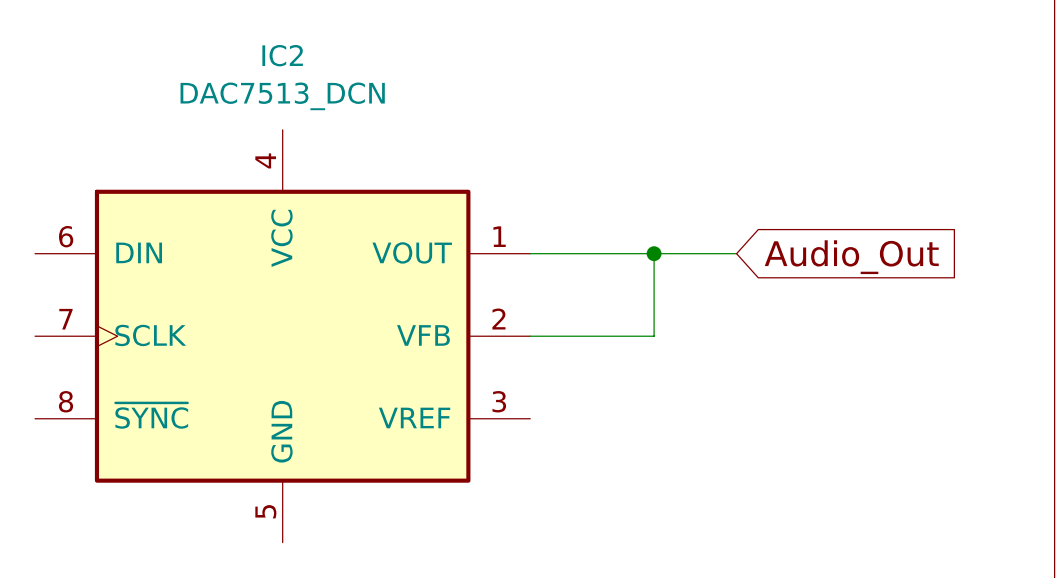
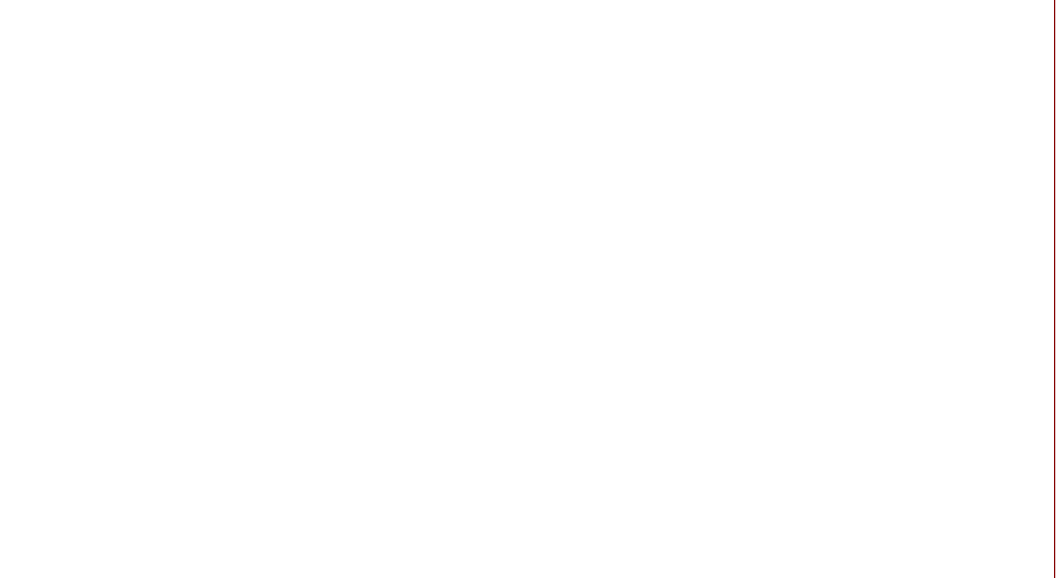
wire: (530, 253) (736, 253) -> none
wire: (654, 253) (654, 336) (530, 336) -> none
junction: (654, 253) -> none
global label: Audio_Out (851, 257) -> none
IC2: DAC7513_DCN (282, 336) -> none

